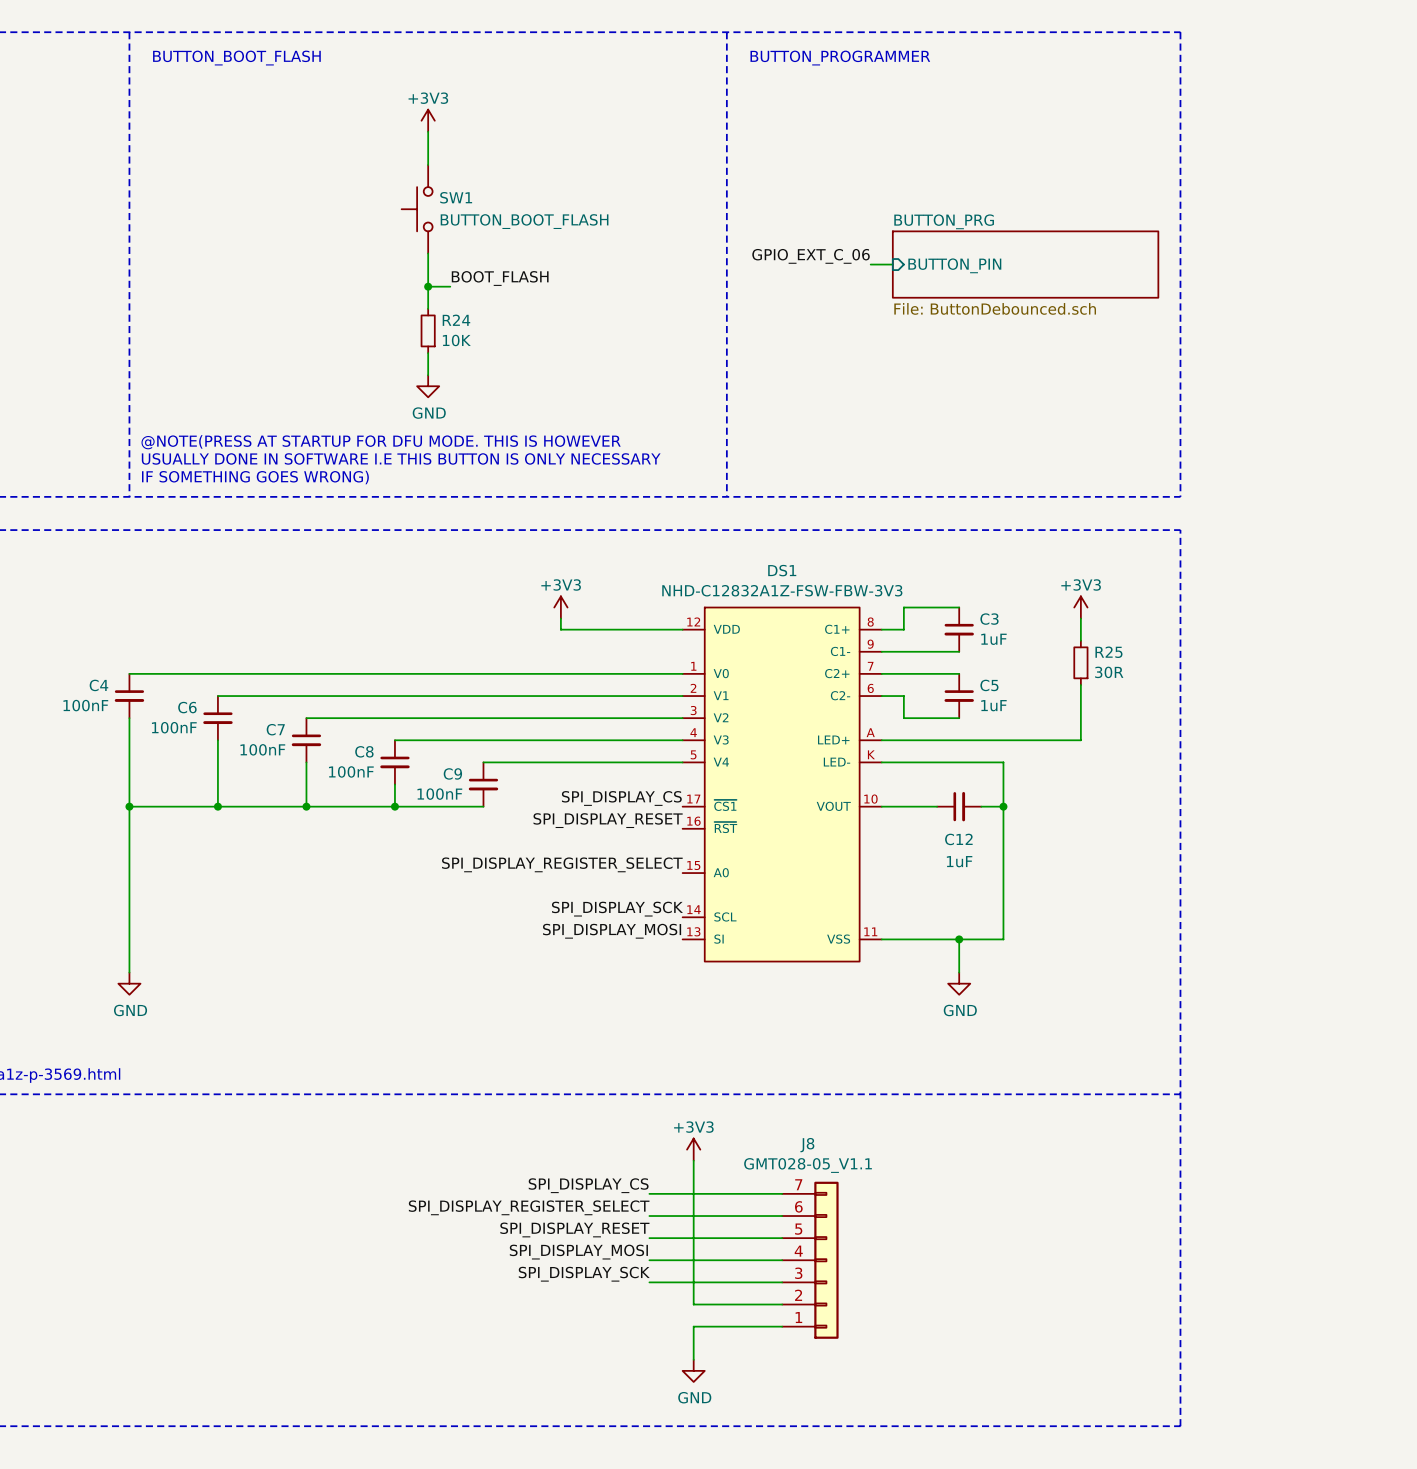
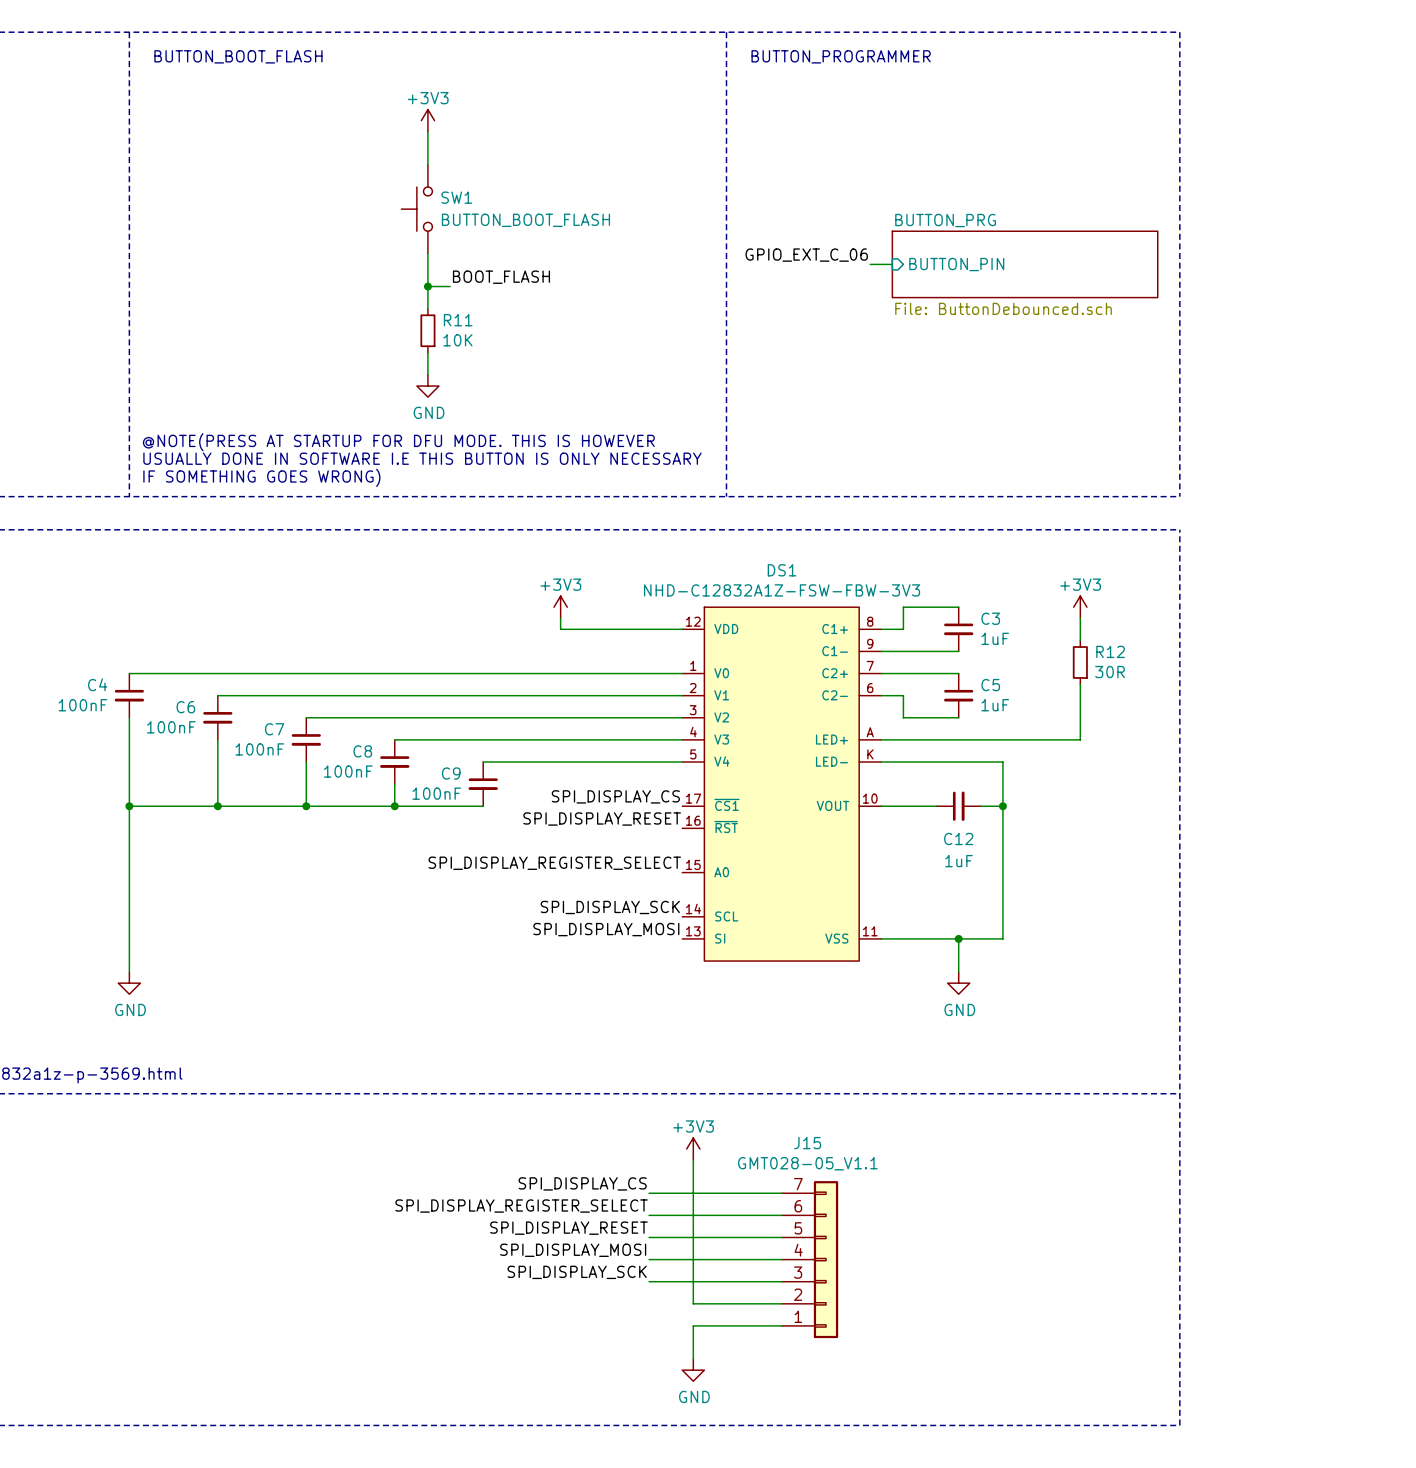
R24 name: R24 (456, 320) -> R11 (458, 320)
R25 name: R25 (1108, 652) -> R12 (1110, 651)
J8 name: J8 (807, 1145) -> J15 (807, 1143)

